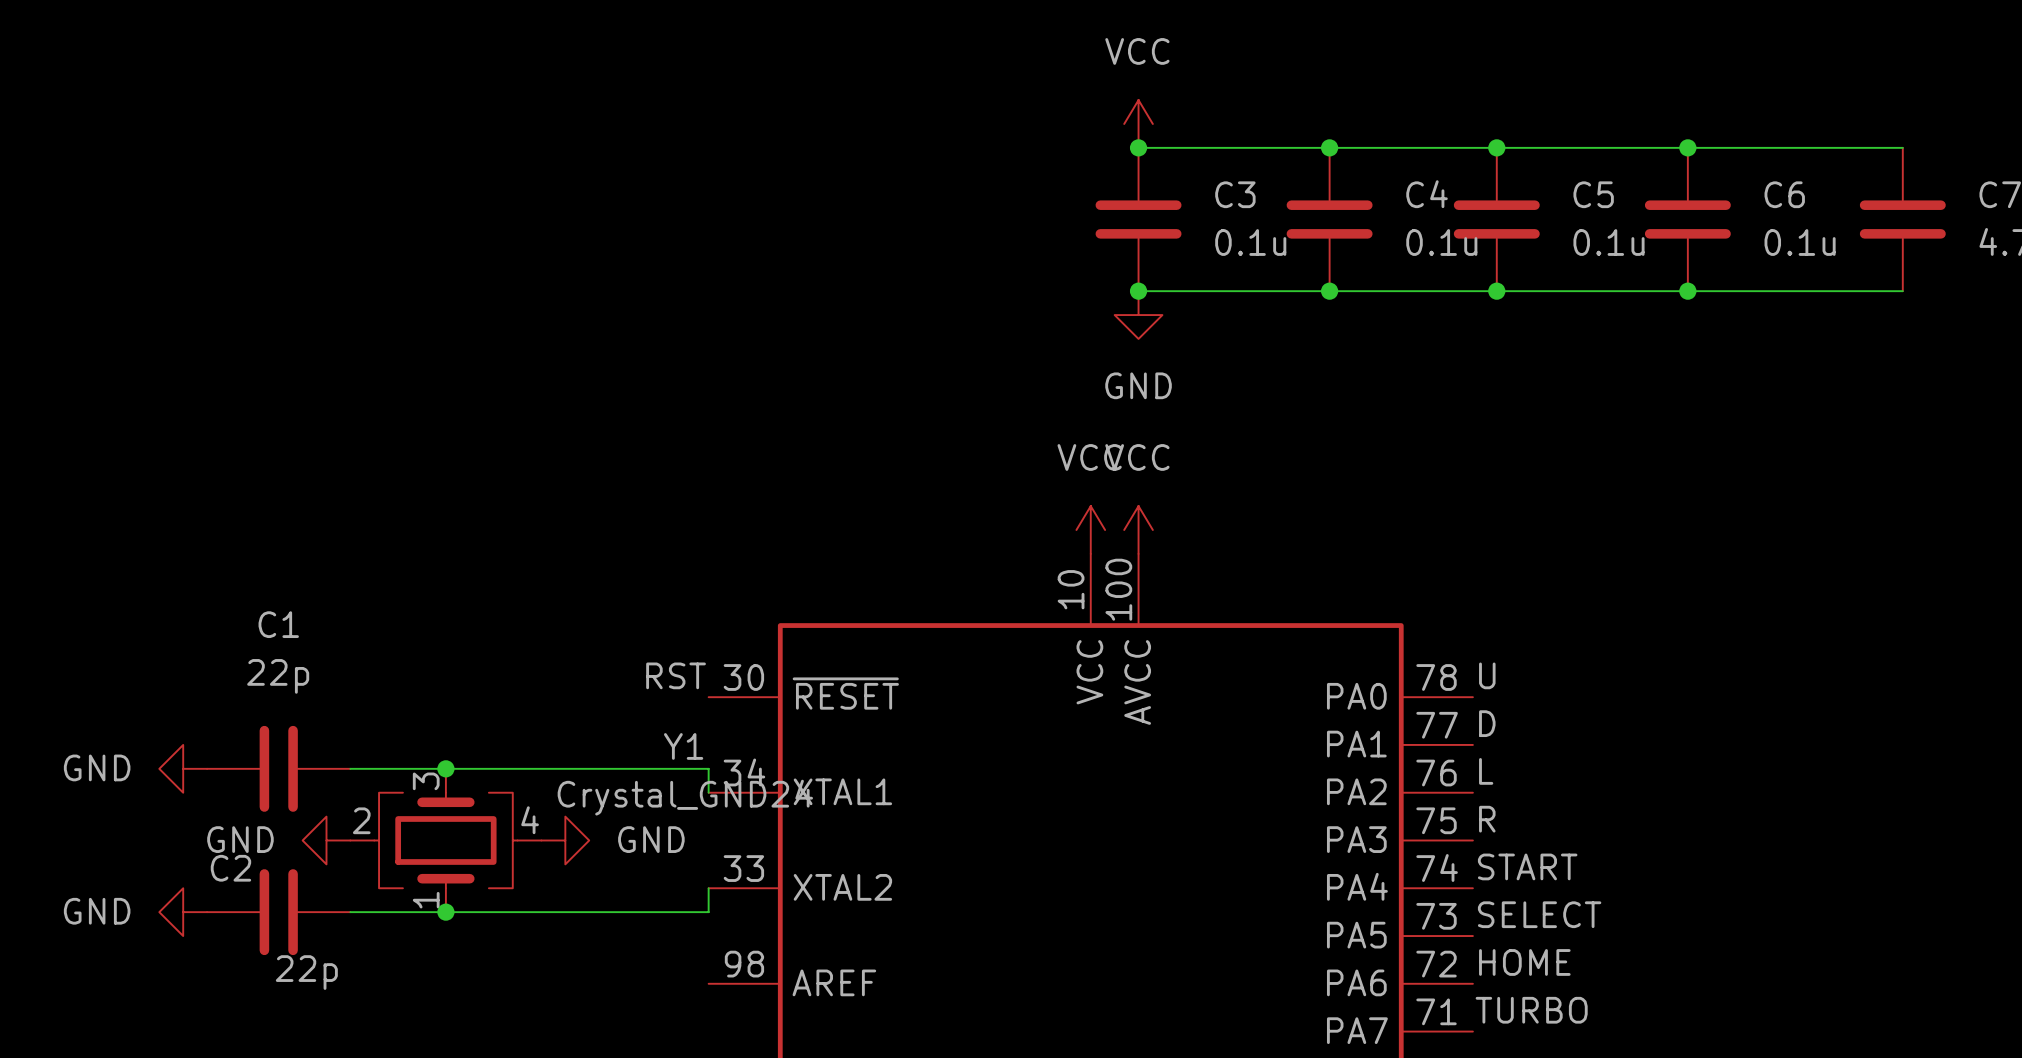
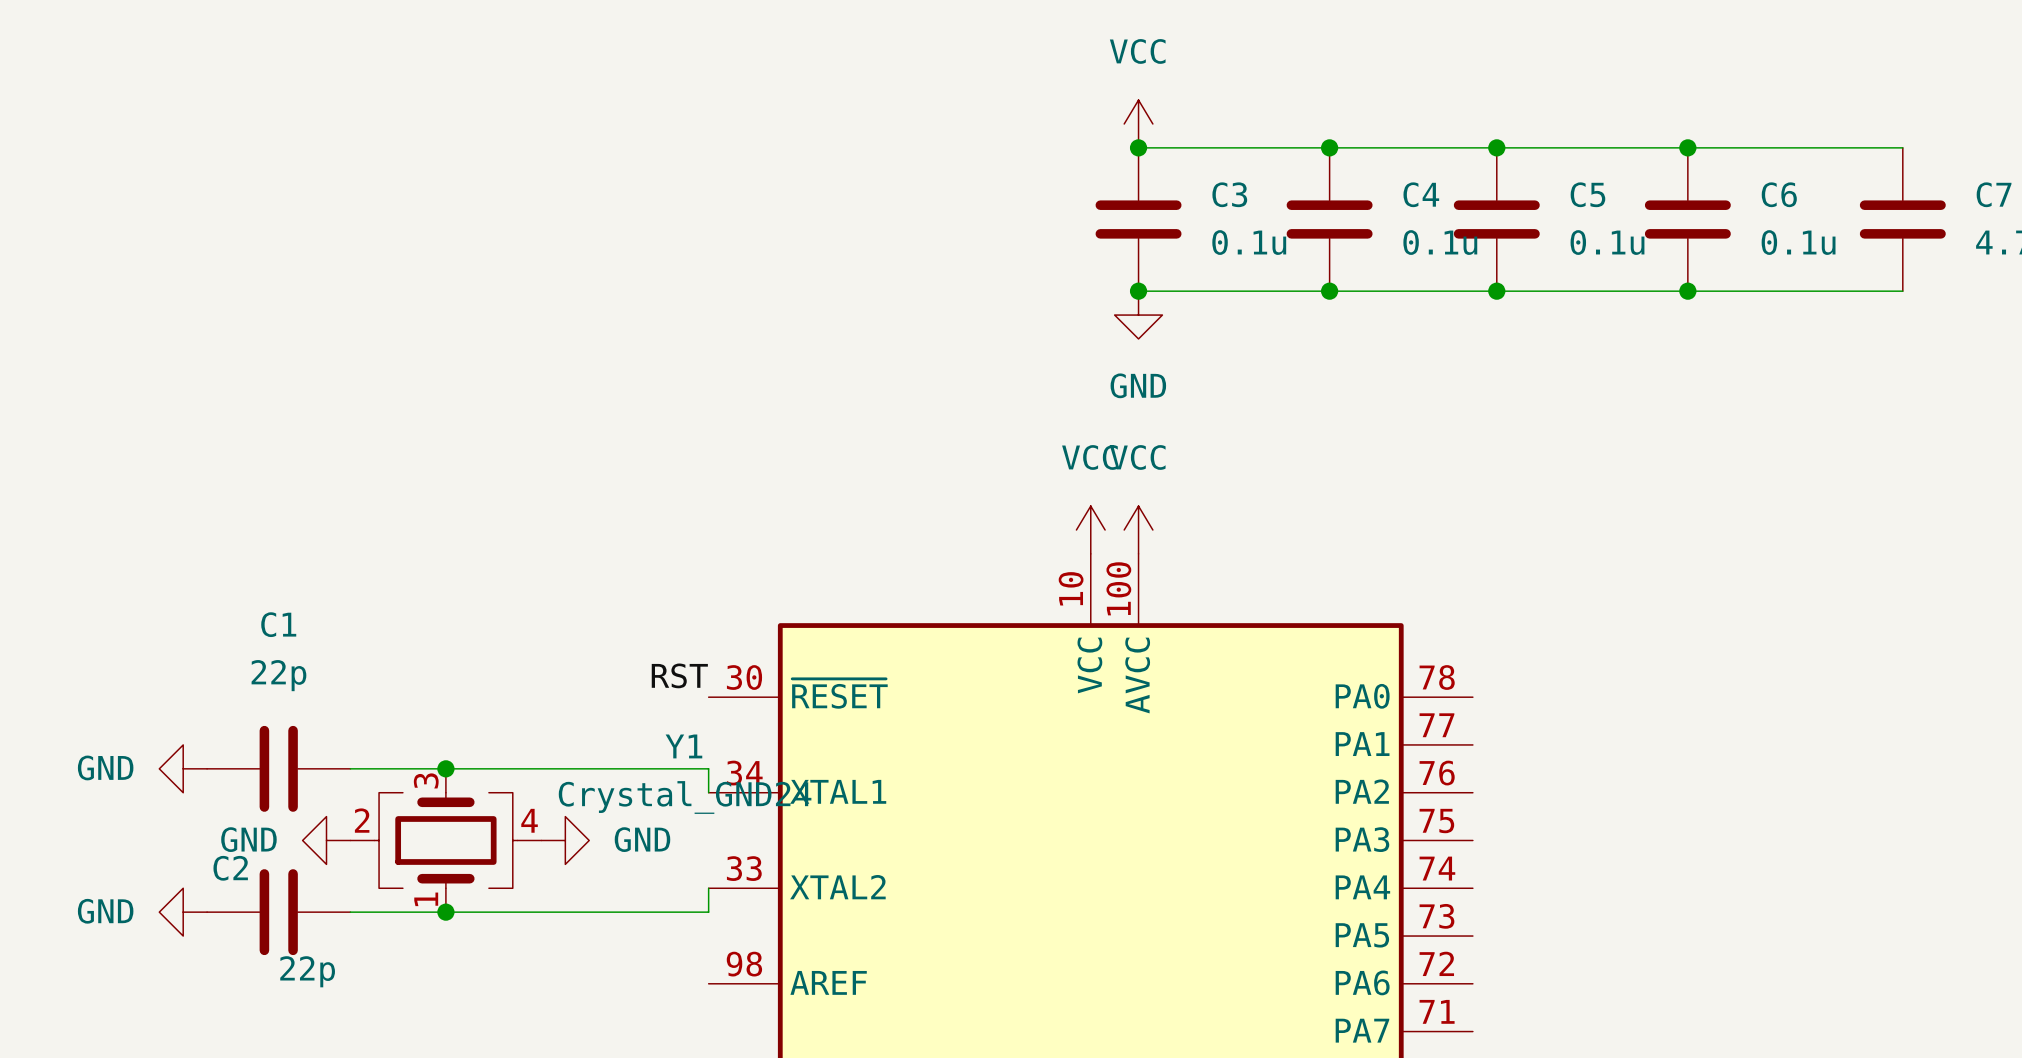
label: U (1487, 675) -> none
label: D (1487, 723) -> none
label: L (1486, 771) -> none
label: R (1487, 819) -> none
label: START (1527, 866) -> none
label: SELECT (1539, 914) -> none
label: HOME (1524, 962) -> none
label: TURBO (1531, 1010) -> none

